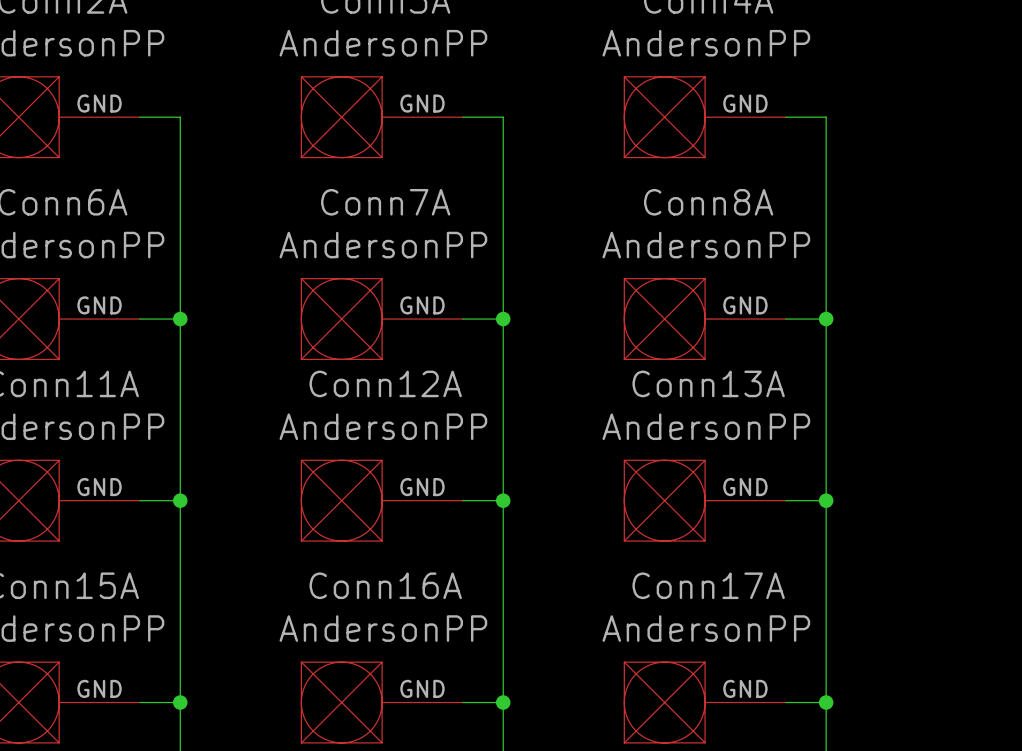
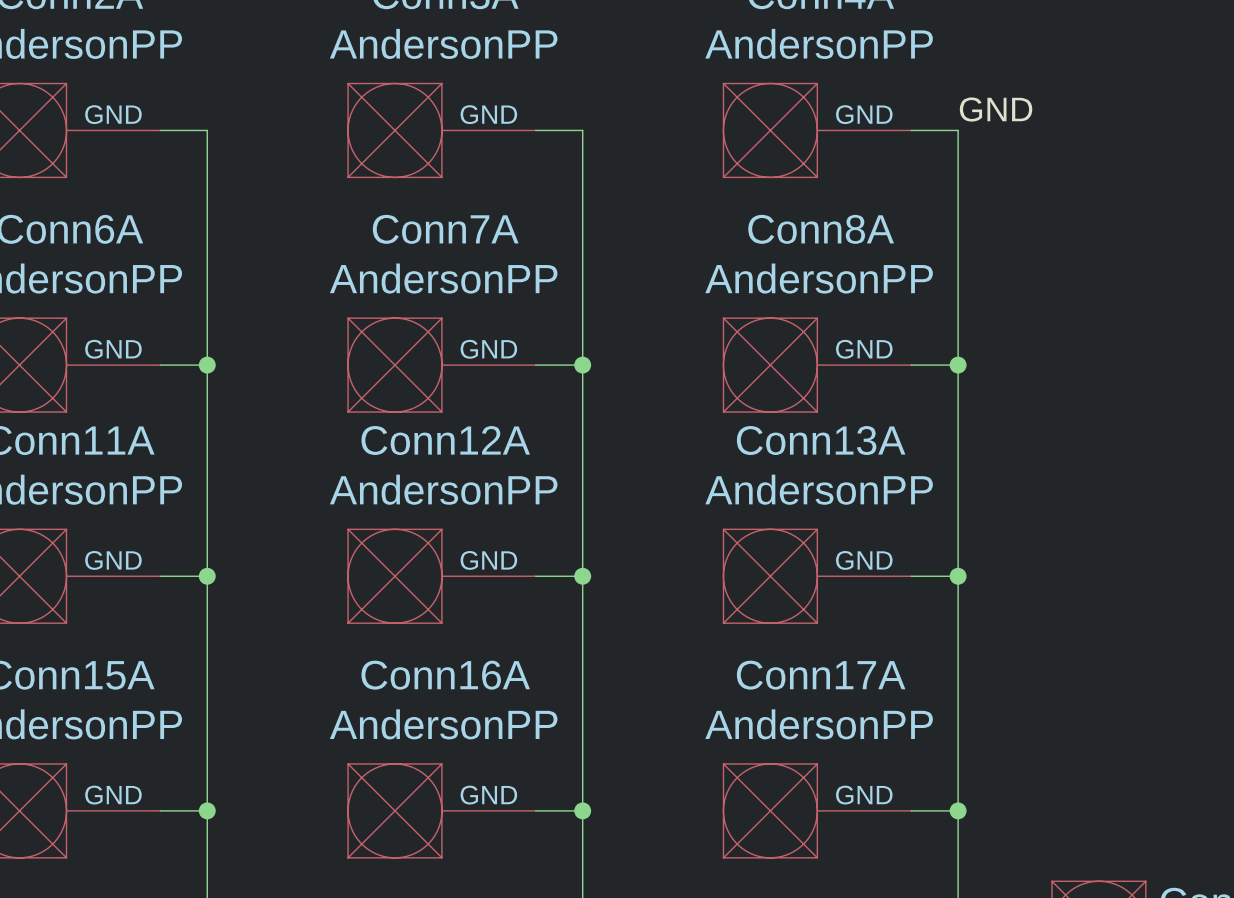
label: none -> GND (996, 109)

